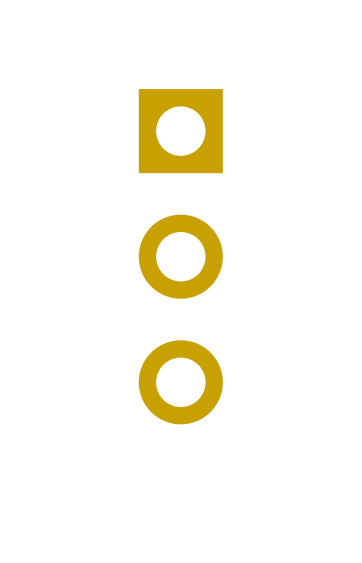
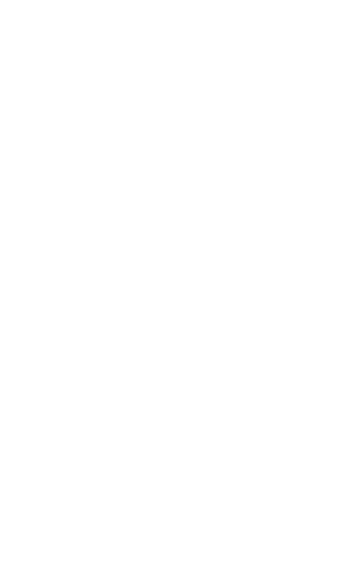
part: (180, 256) -> none

